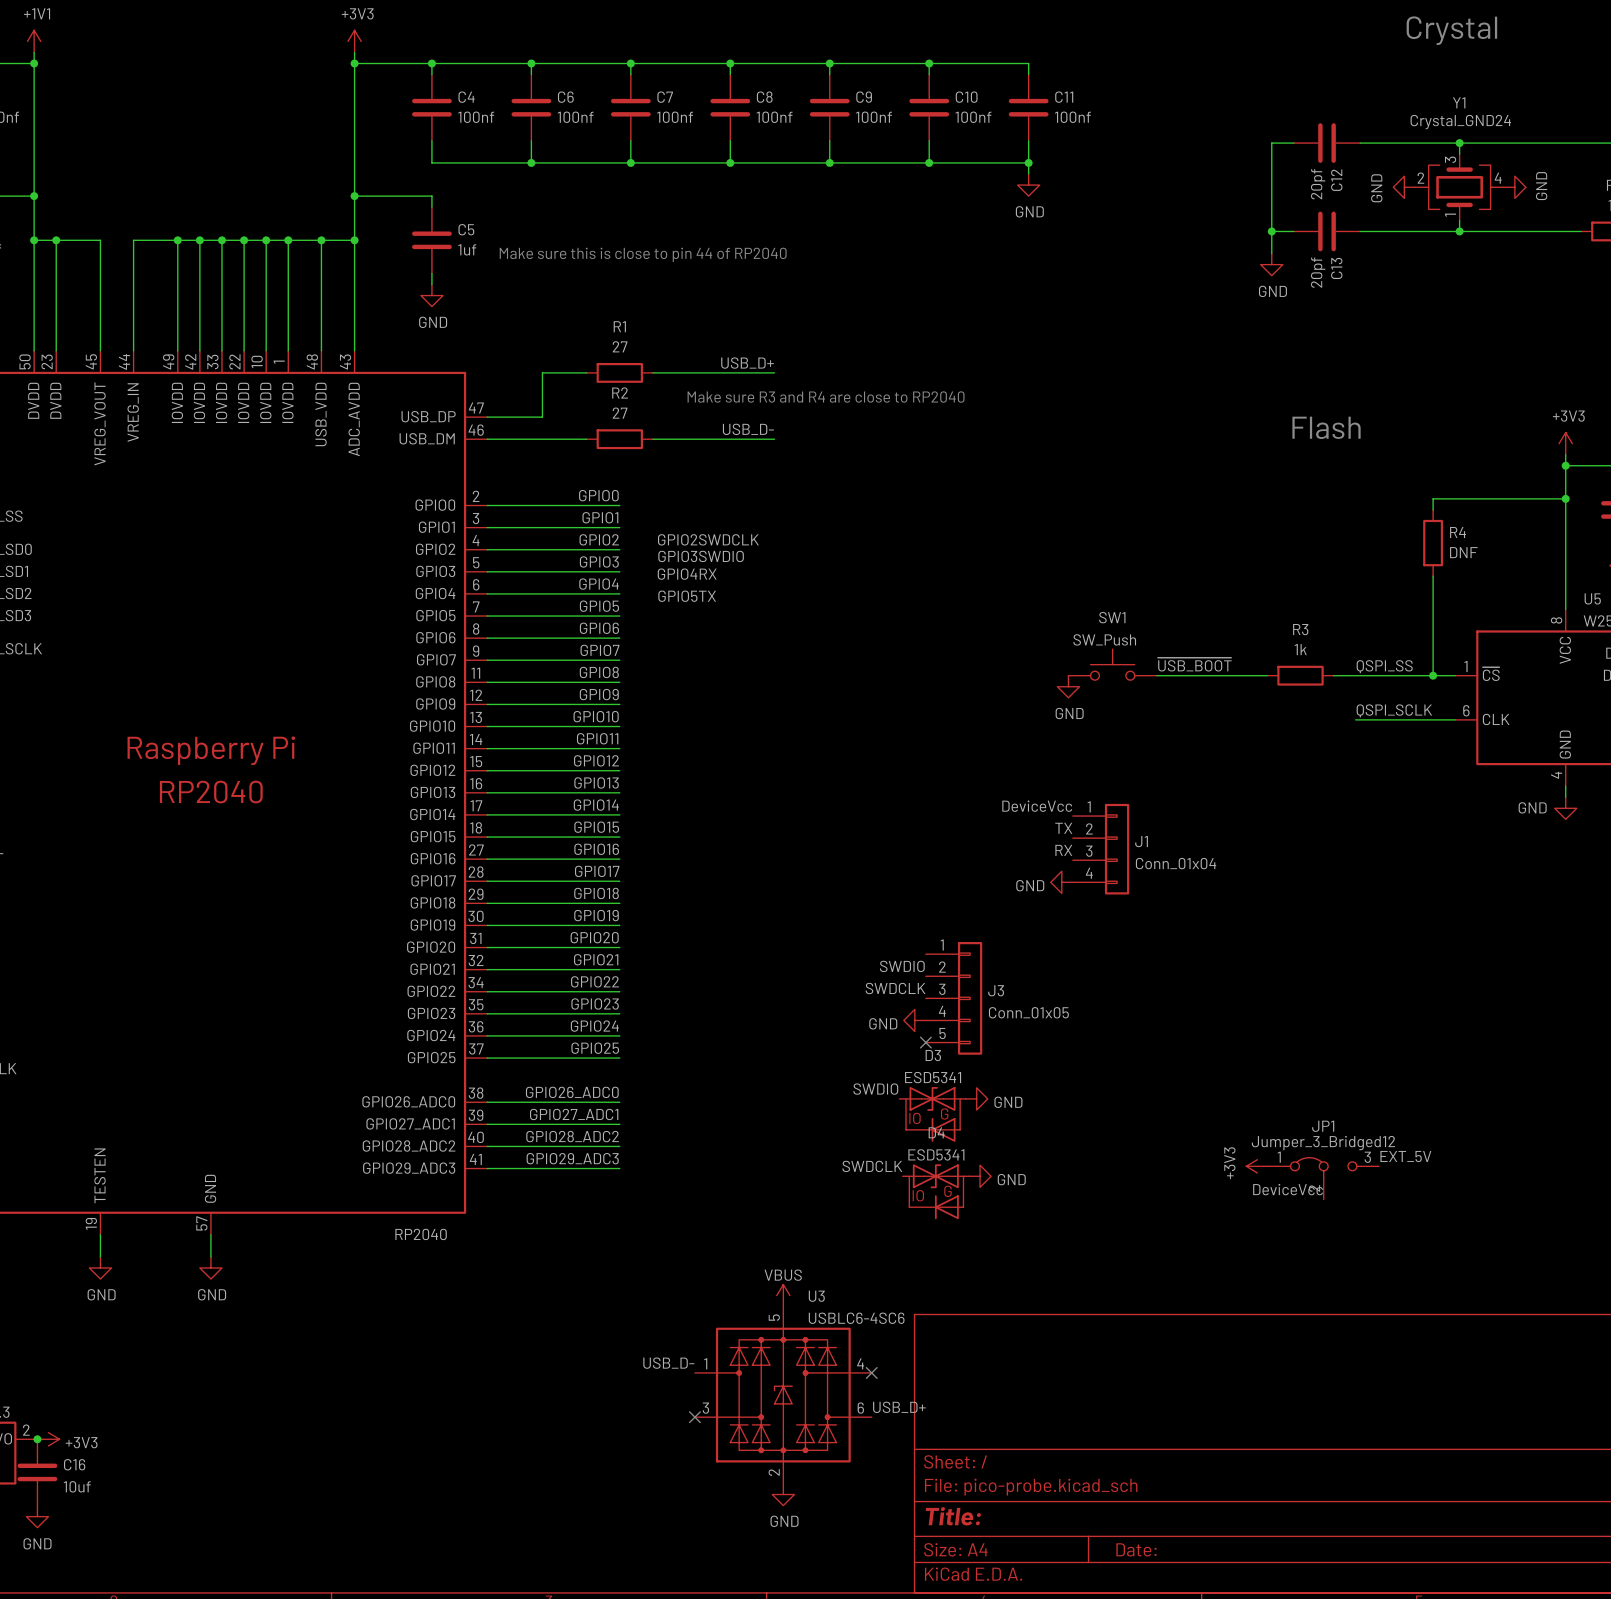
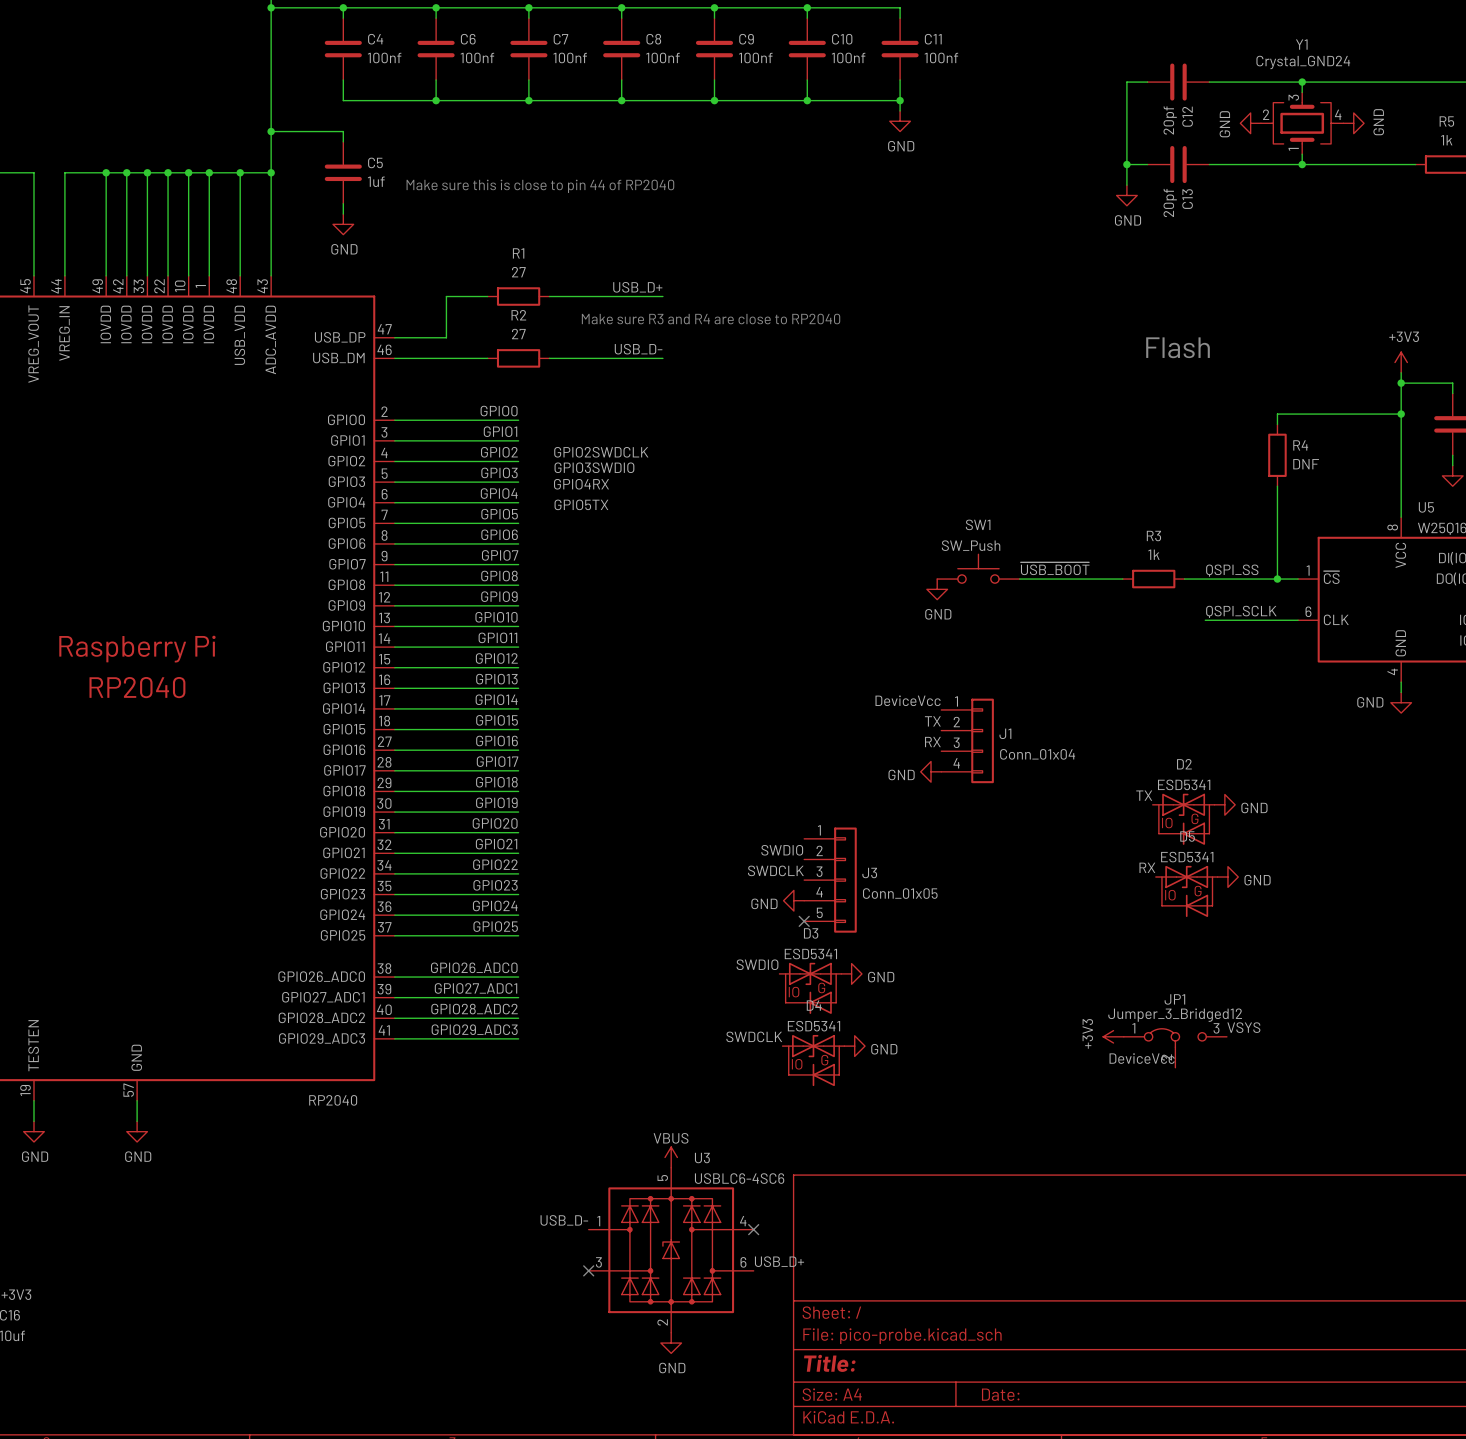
label: none -> TX (1144, 795)
power symbol: none -> GND (1224, 804)
D2: none -> ESD5341 (1183, 819)
label: none -> RX (1147, 867)
power symbol: none -> GND (1227, 877)
D5: none -> ESD5341 (1186, 891)
label: EXT_5V (1405, 1156) -> VSYS (1243, 1027)

